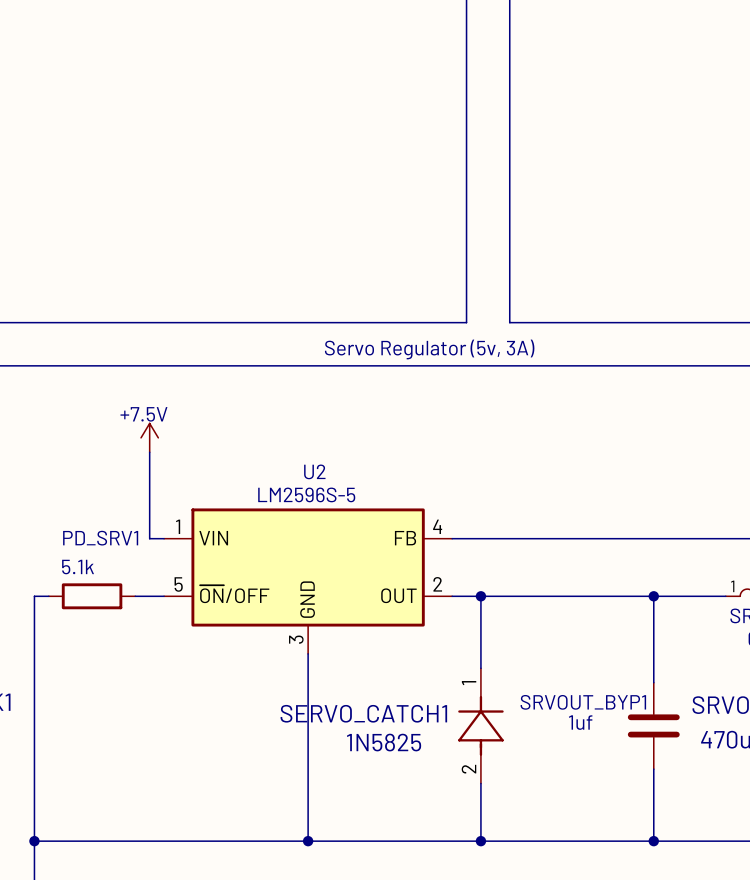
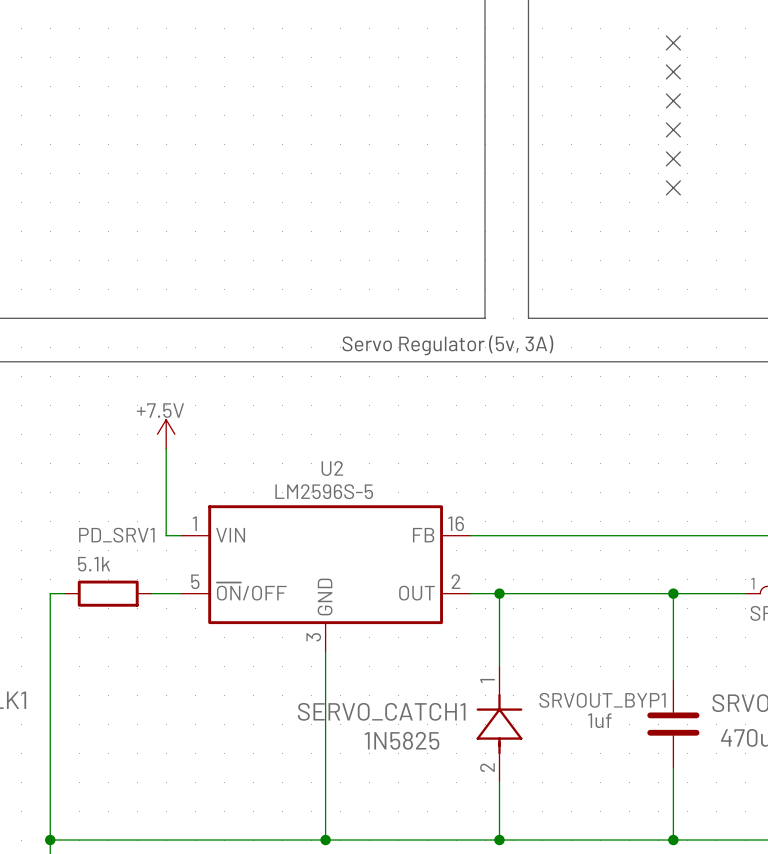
no-connect mark: none -> (673, 42)
no-connect mark: none -> (673, 71)
no-connect mark: none -> (673, 100)
no-connect mark: none -> (673, 129)
no-connect mark: none -> (673, 158)
no-connect mark: none -> (673, 187)
U2 pin number: 4 (437, 526) -> 16 (456, 523)

